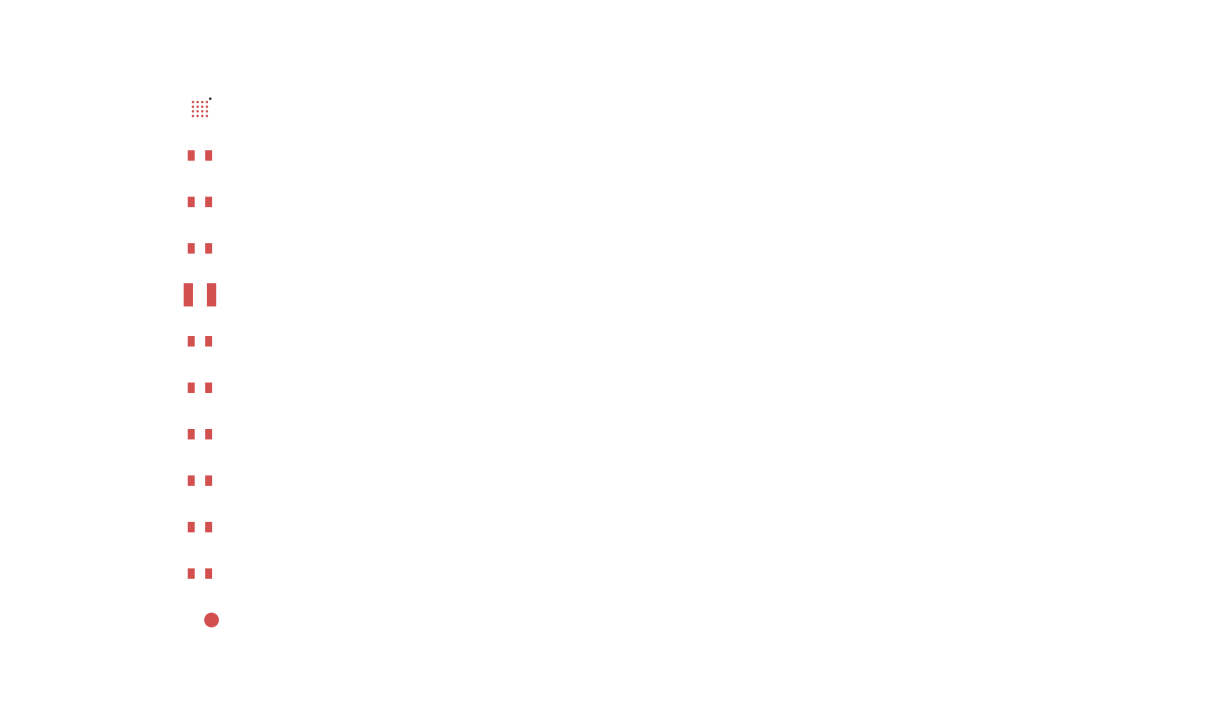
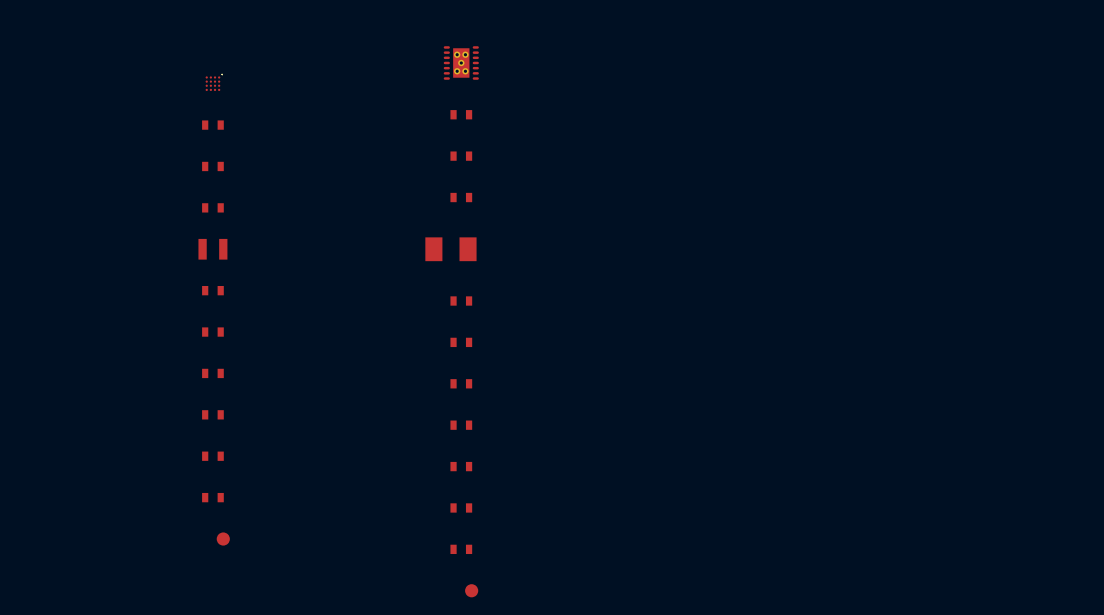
part: none -> (461, 62)
part: none -> (461, 114)
part: none -> (461, 156)
part: none -> (461, 197)
part: none -> (450, 249)
part: none -> (461, 301)
part: none -> (461, 342)
part: none -> (461, 383)
part: none -> (461, 425)
part: none -> (461, 466)
part: none -> (461, 507)
part: none -> (461, 549)
part: none -> (471, 590)

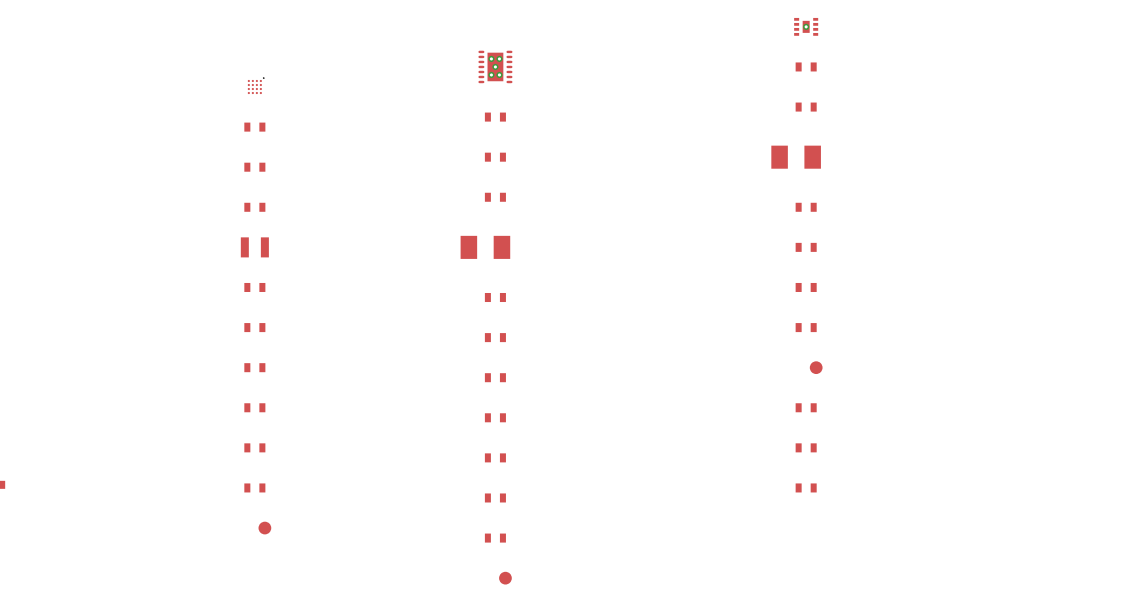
part: none -> (806, 26)
part: none -> (806, 66)
part: none -> (806, 107)
part: none -> (796, 157)
part: none -> (806, 207)
part: none -> (806, 247)
part: none -> (806, 287)
part: none -> (806, 327)
part: none -> (816, 367)
part: none -> (806, 407)
part: none -> (806, 447)
part: none -> (806, 487)

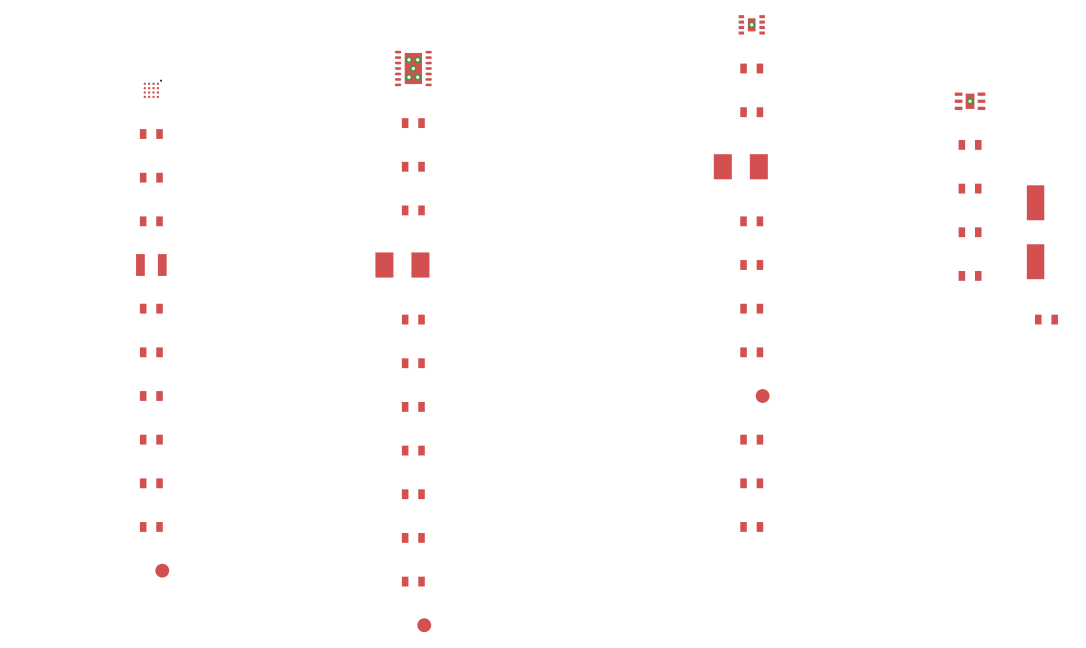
part: none -> (970, 101)
part: none -> (970, 144)
part: none -> (970, 188)
part: none -> (970, 232)
part: none -> (1035, 232)
part: none -> (970, 275)
part: none -> (1046, 319)

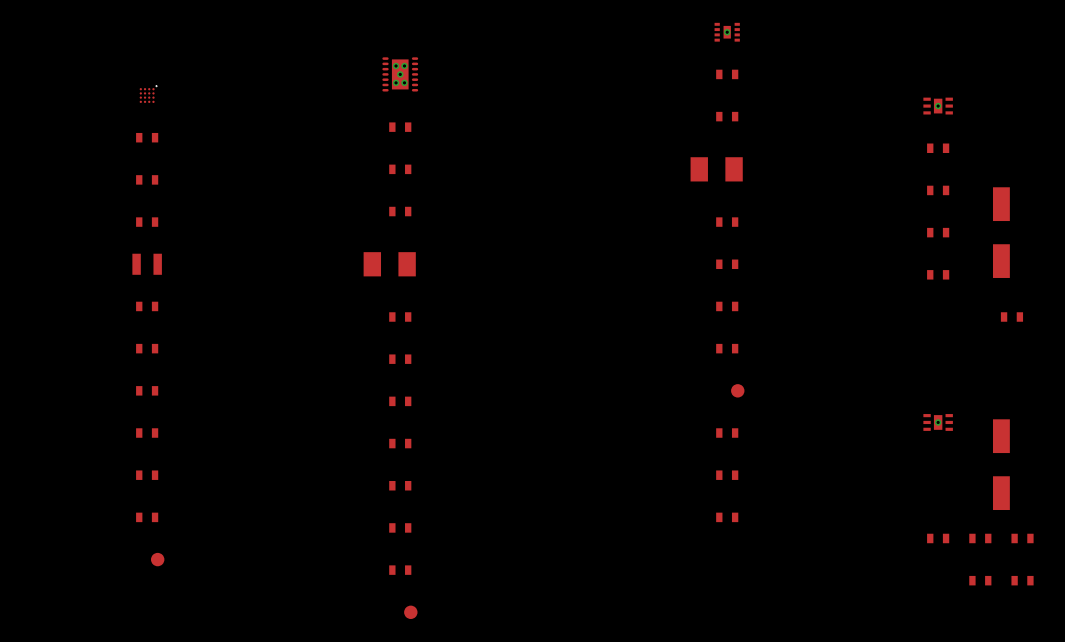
part: none -> (938, 422)
part: none -> (1001, 464)
part: none -> (938, 538)
part: none -> (980, 538)
part: none -> (1022, 538)
part: none -> (980, 580)
part: none -> (1022, 580)

